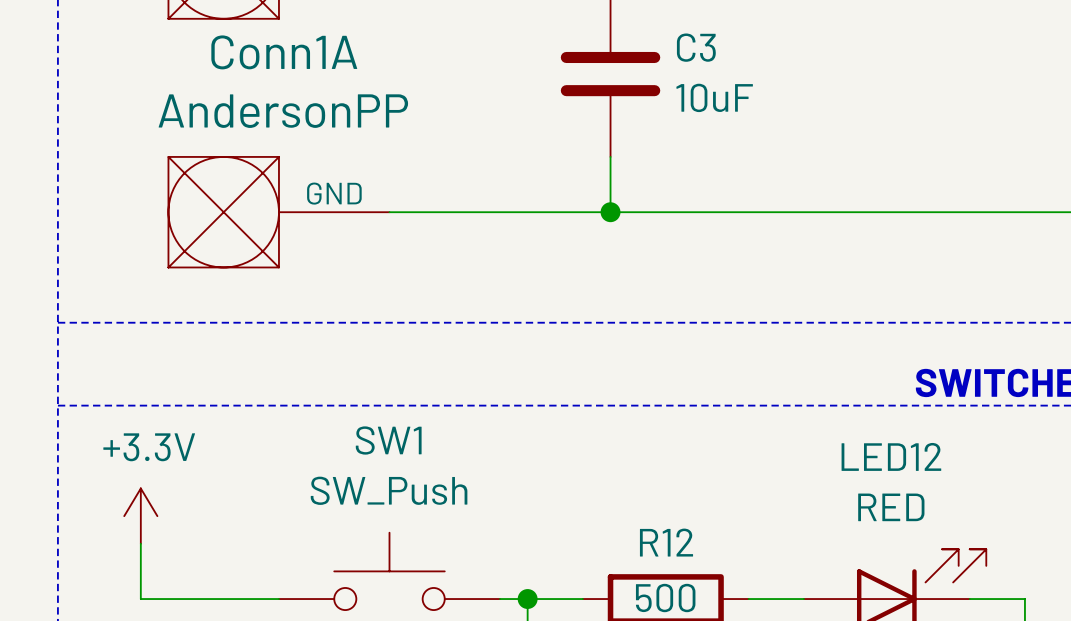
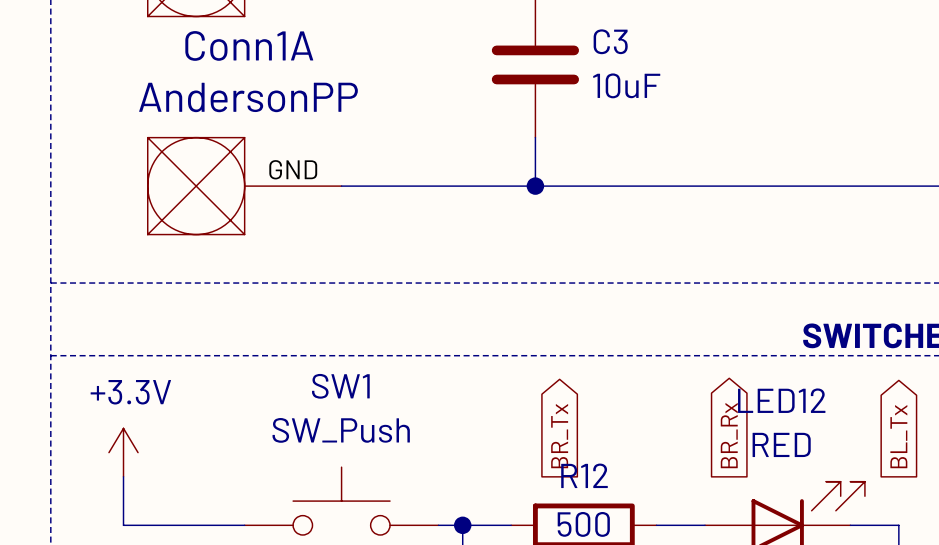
global label: none -> BR_Rx (729, 435)
global label: none -> BR_Tx (559, 436)
global label: none -> BL_Tx (898, 436)

